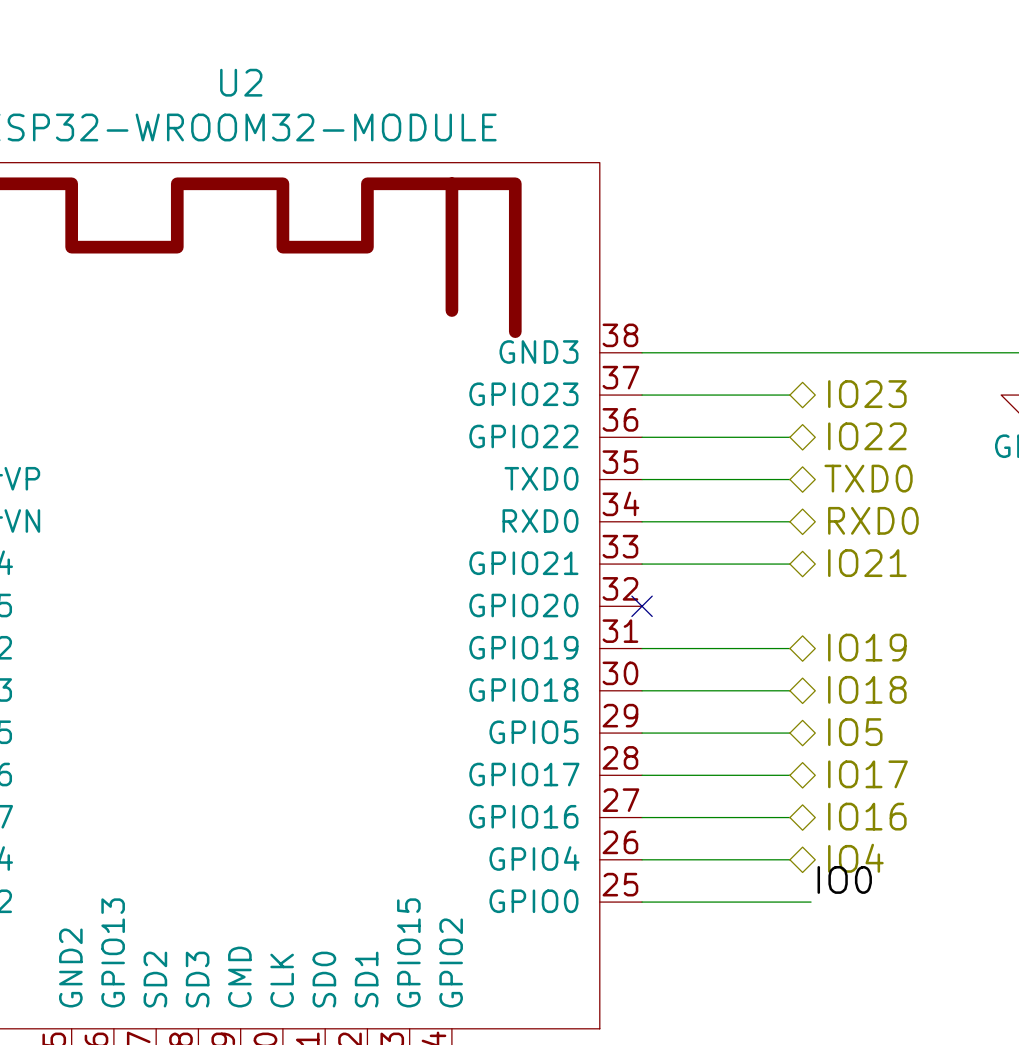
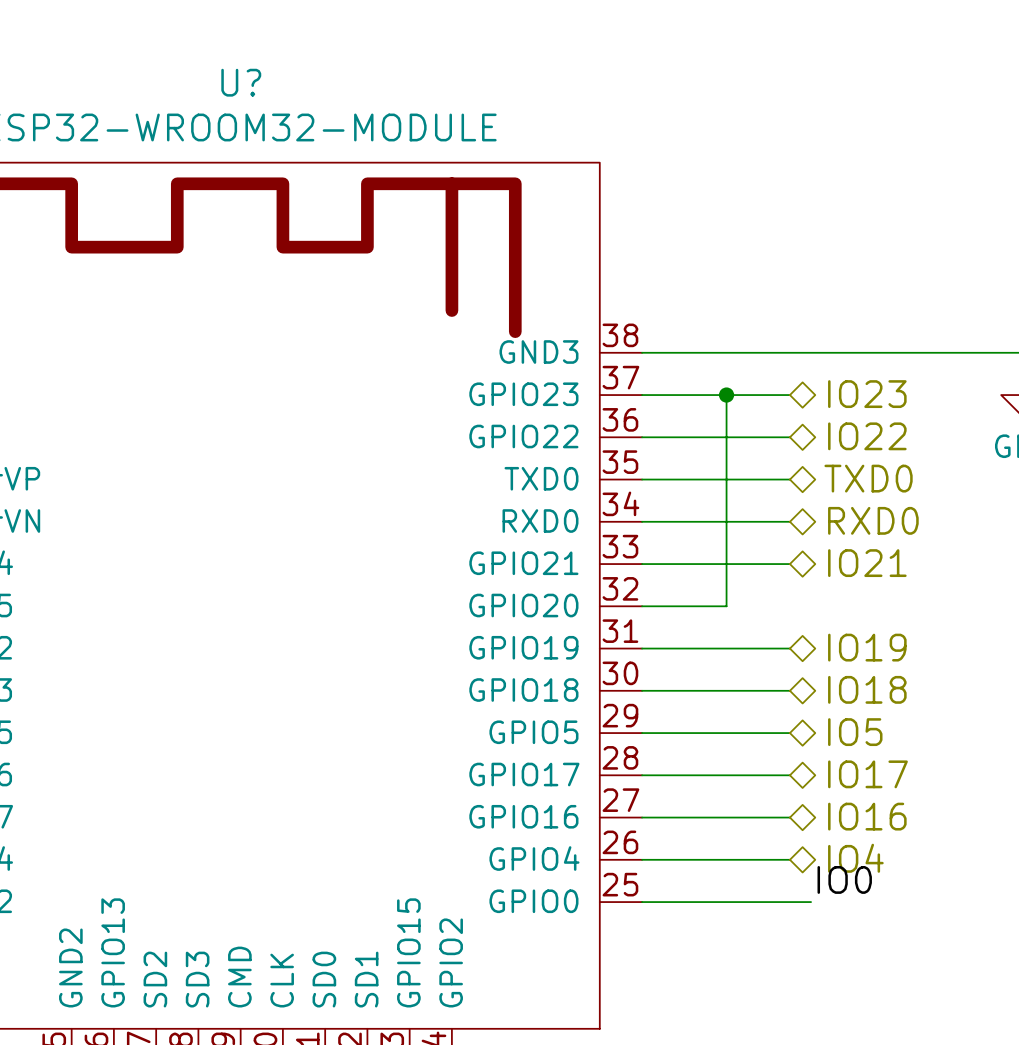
U2 name: U2 (241, 82) -> U? (241, 82)
wire: none -> (726, 395) (726, 606) (642, 606)
junction: none -> (726, 395)
no-connect mark: (642, 606) -> none

